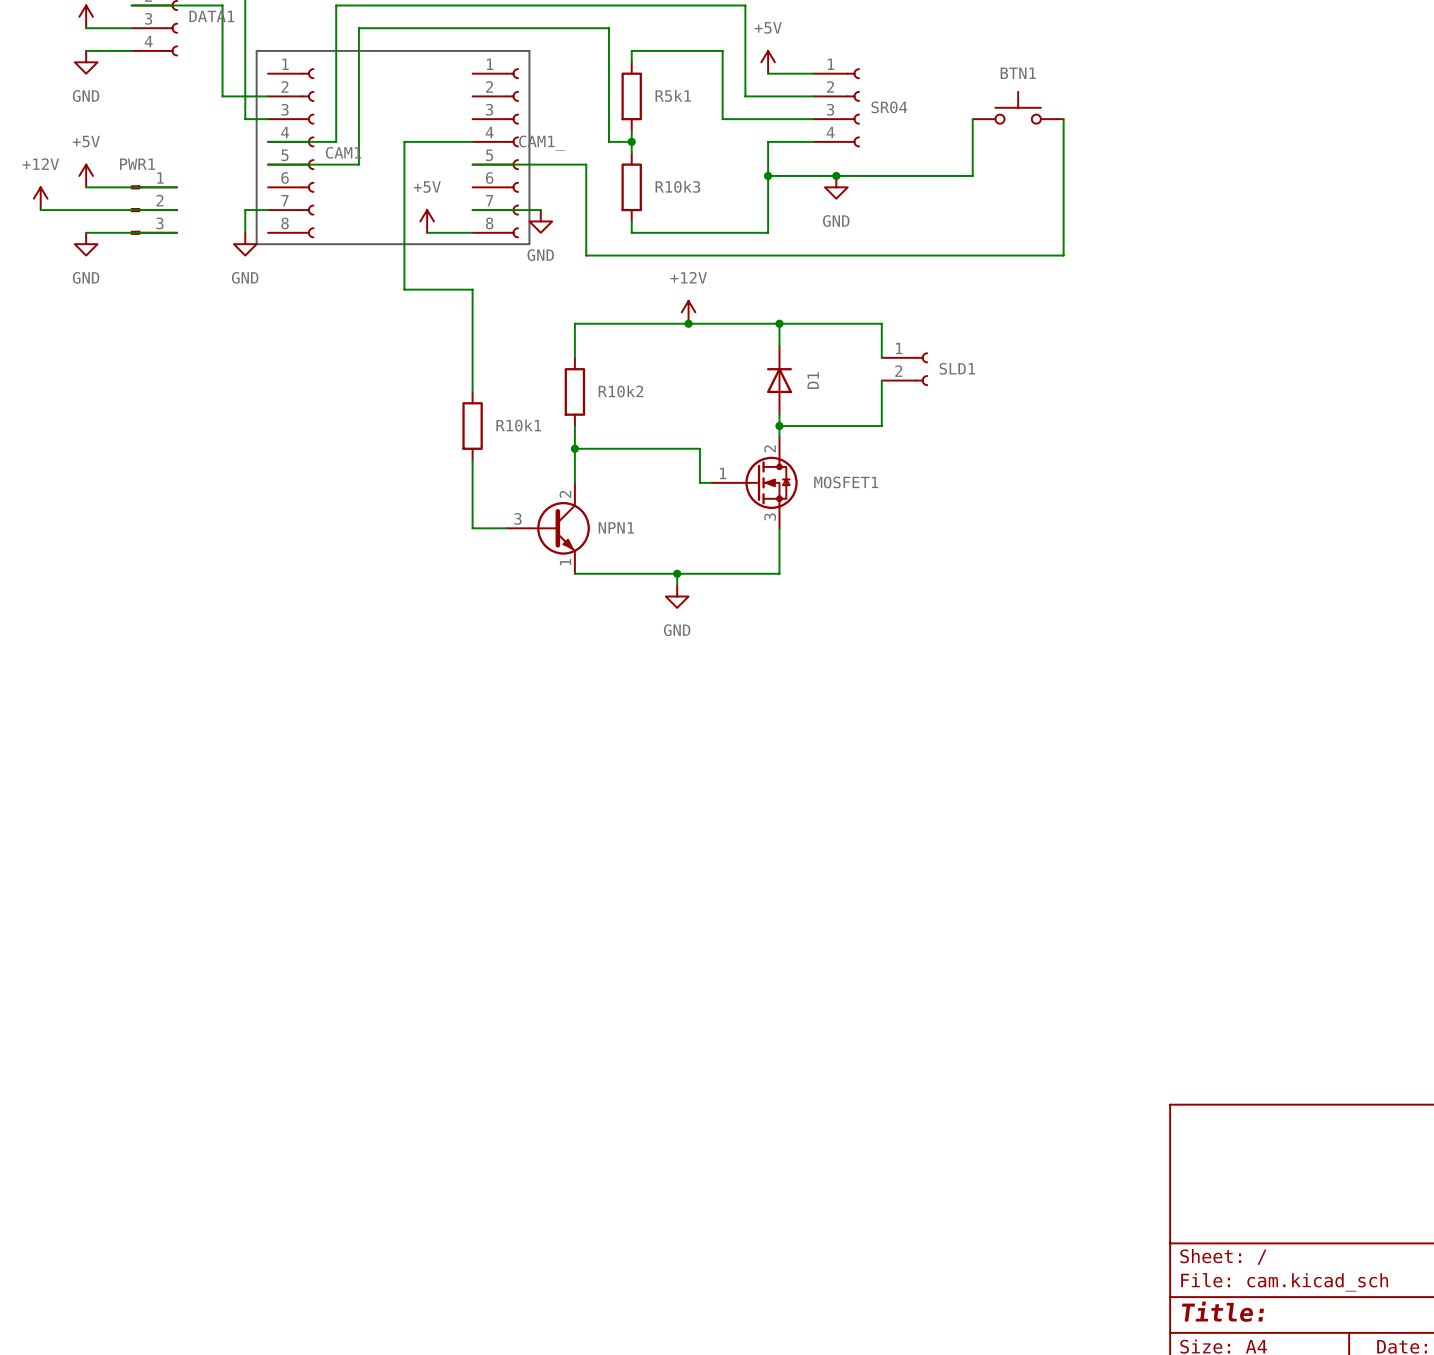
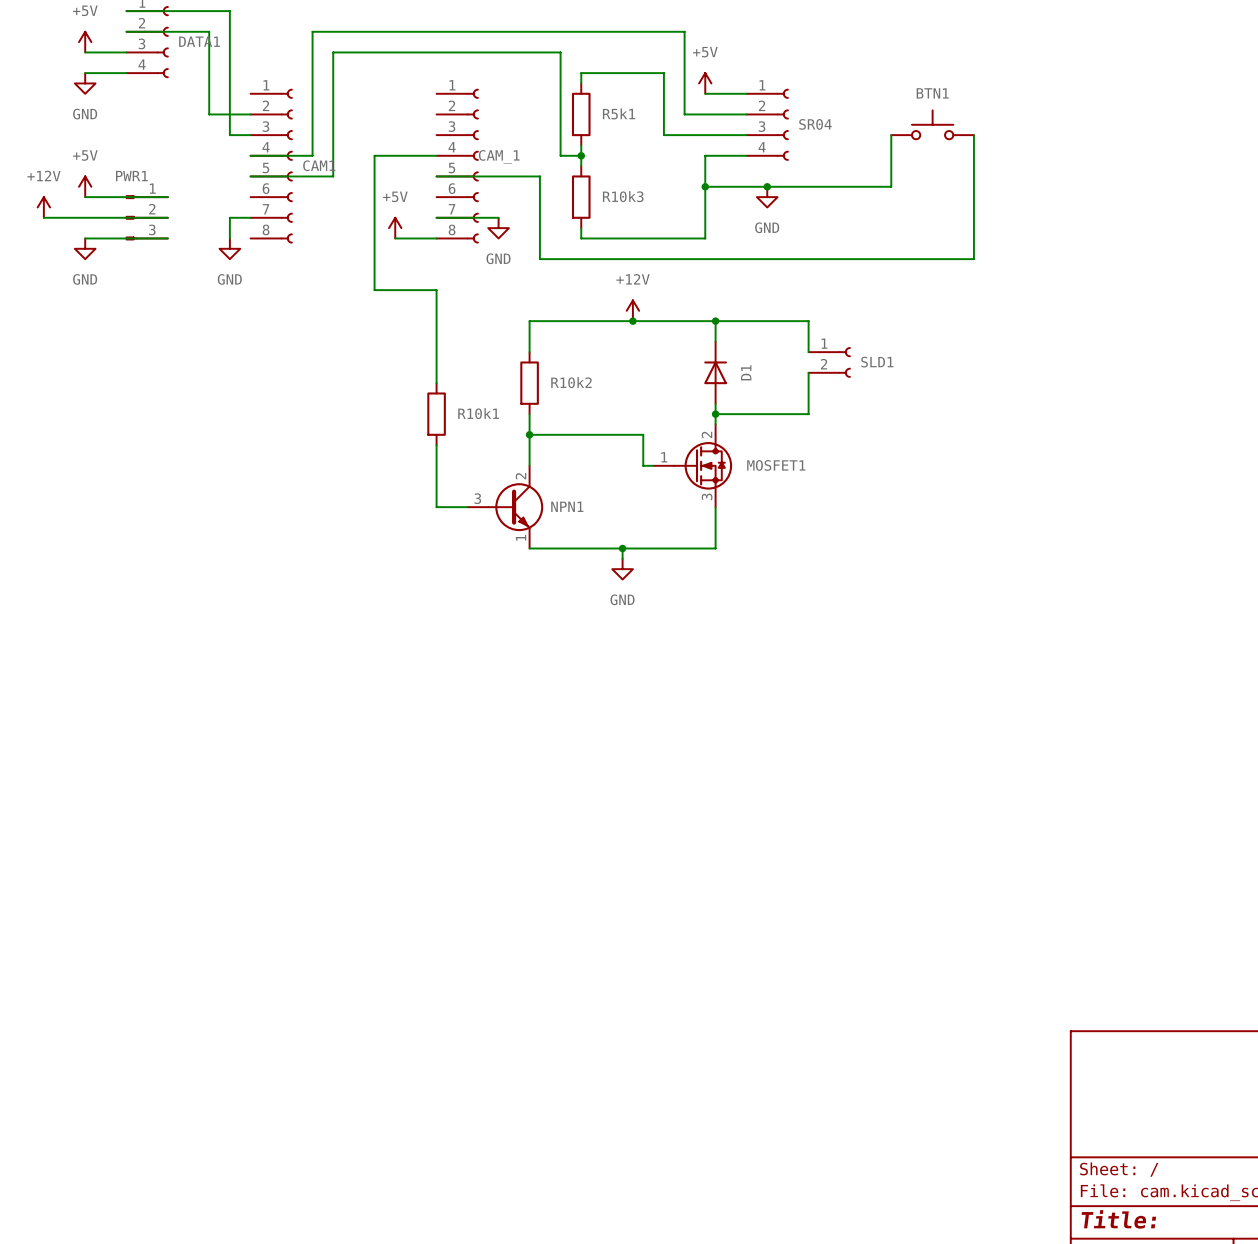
line: (256, 50) (529, 50) (529, 244) (256, 244) (256, 50) -> none
CAM1_ name: CAM1_ (542, 143) -> CAM_1 (499, 156)

